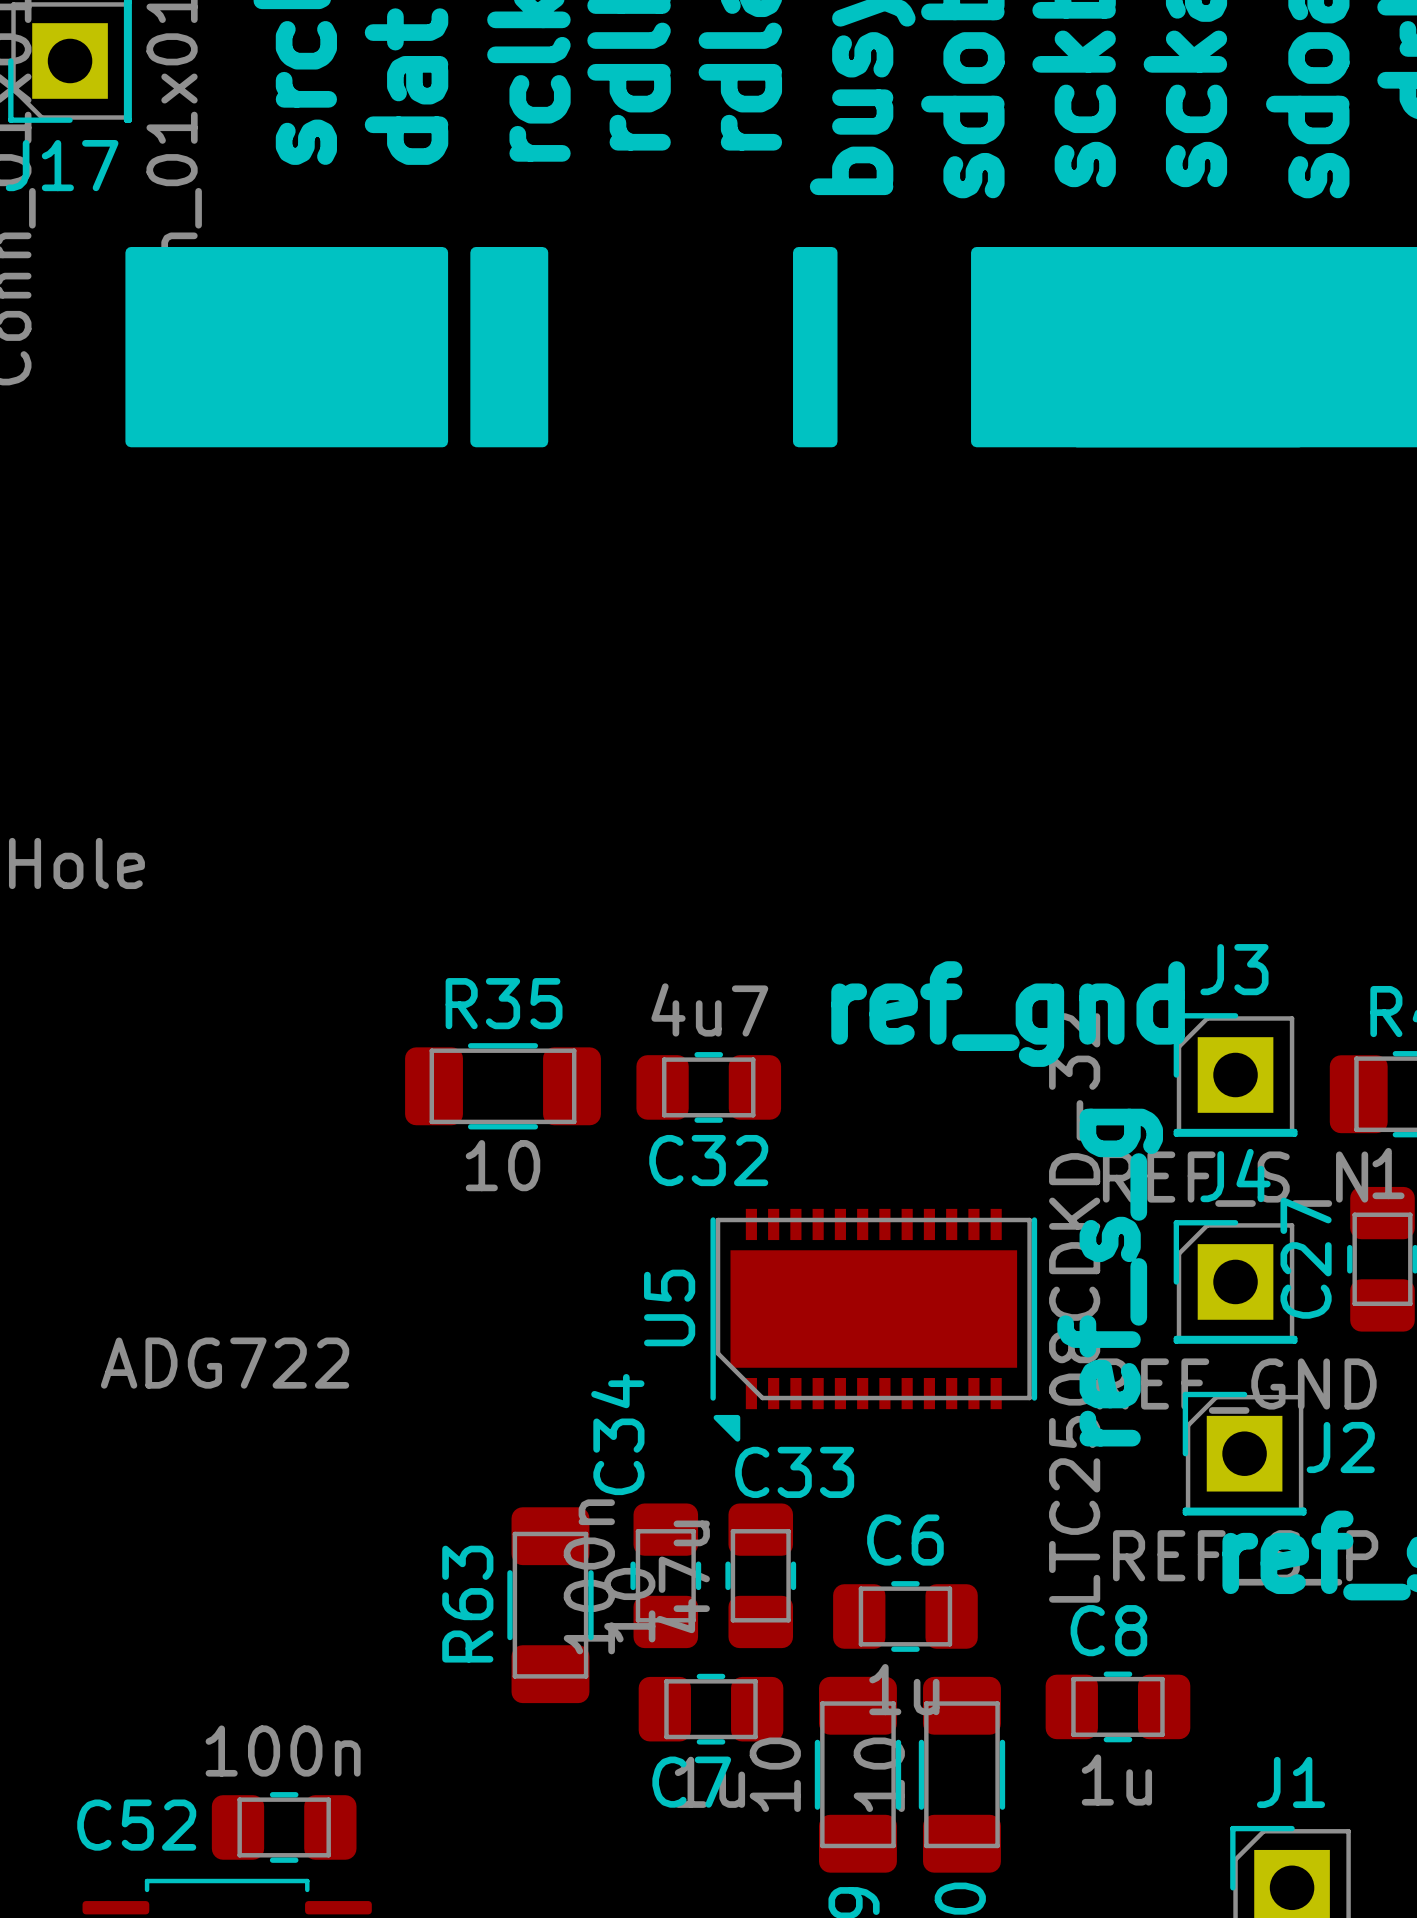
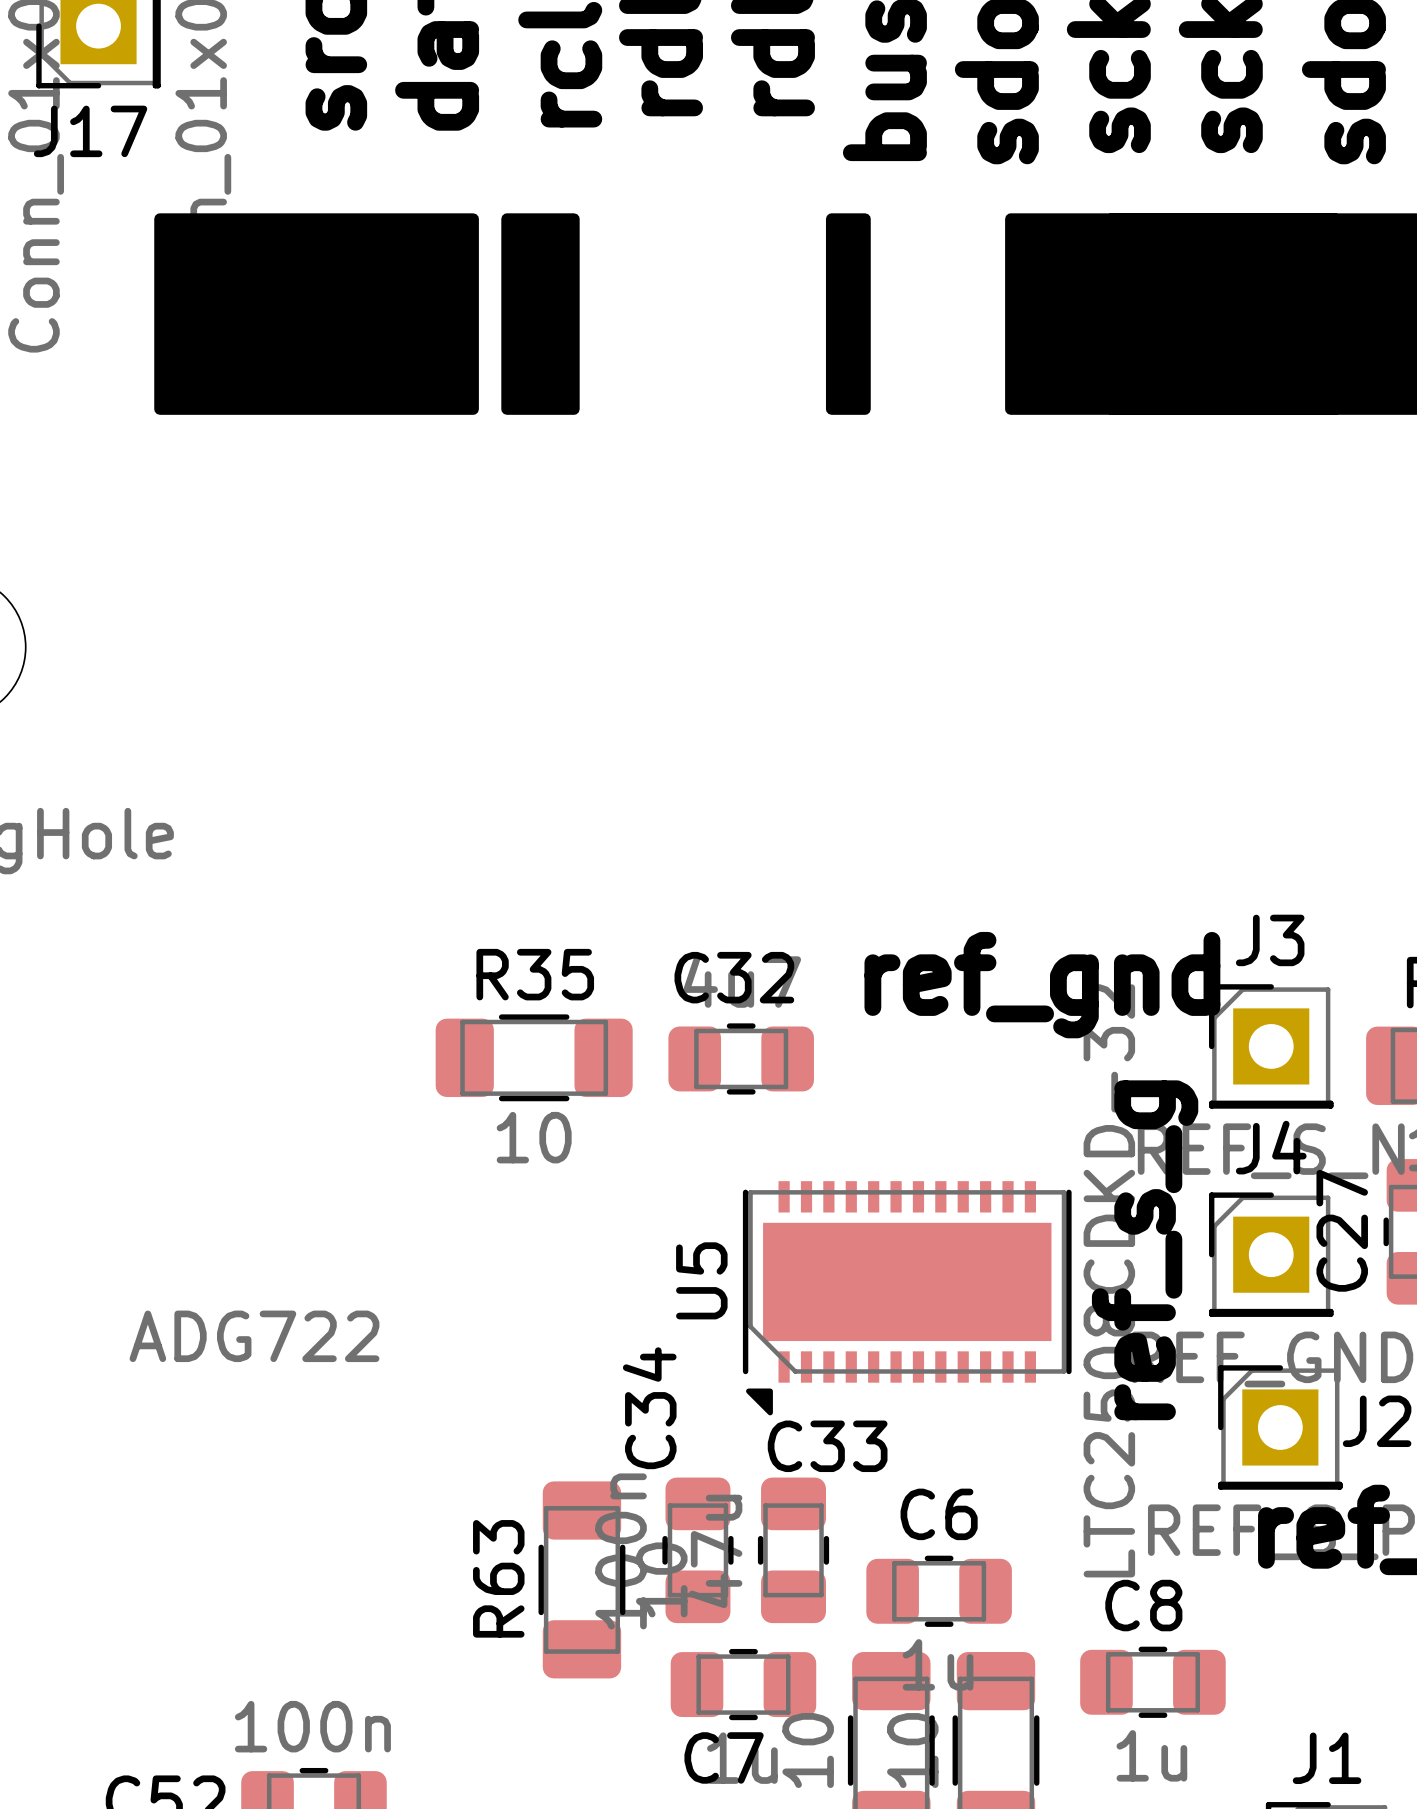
C32 name position: C32 (708, 1160) -> C32 (734, 977)

